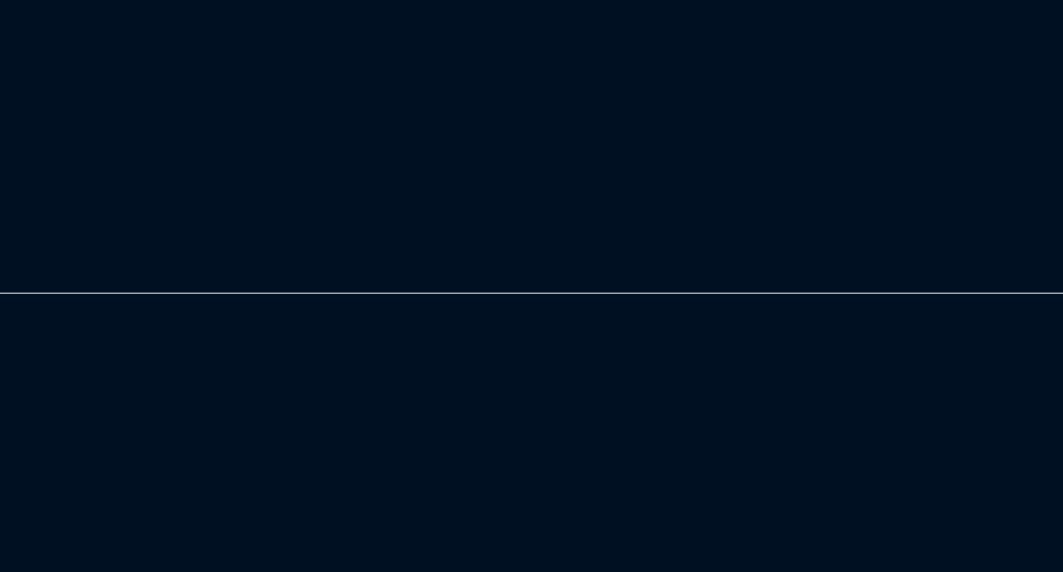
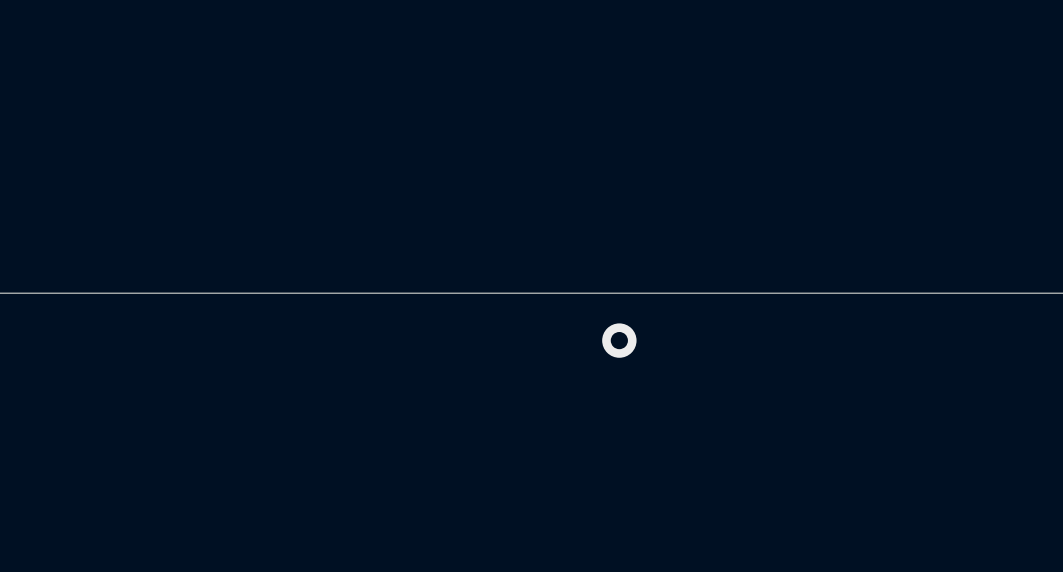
via: none -> (619, 340)

